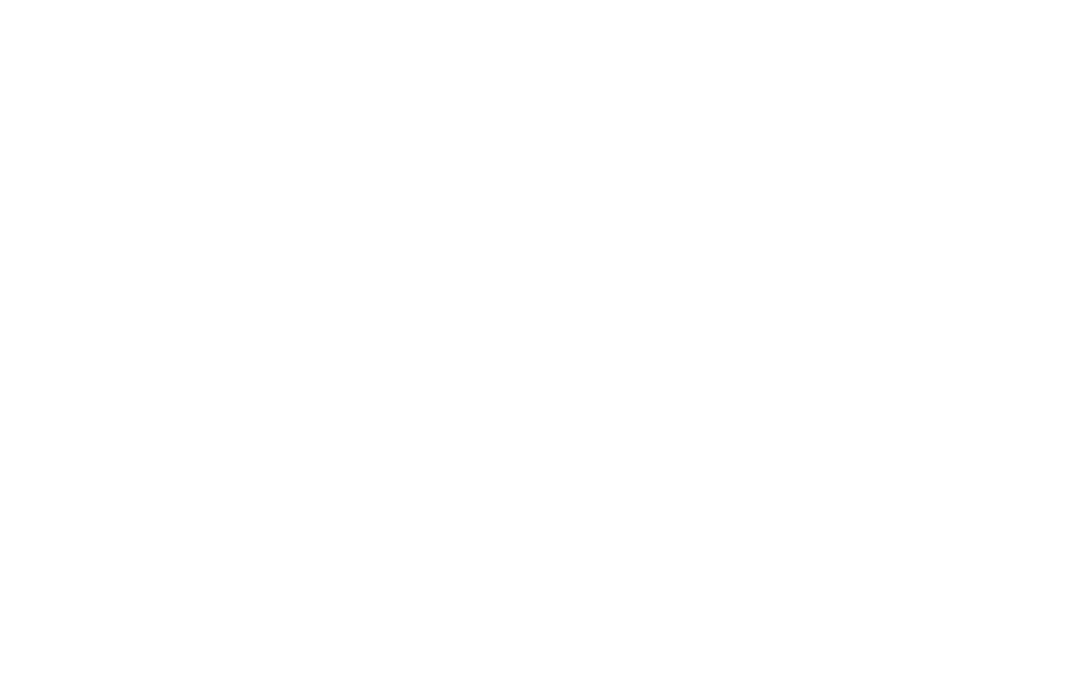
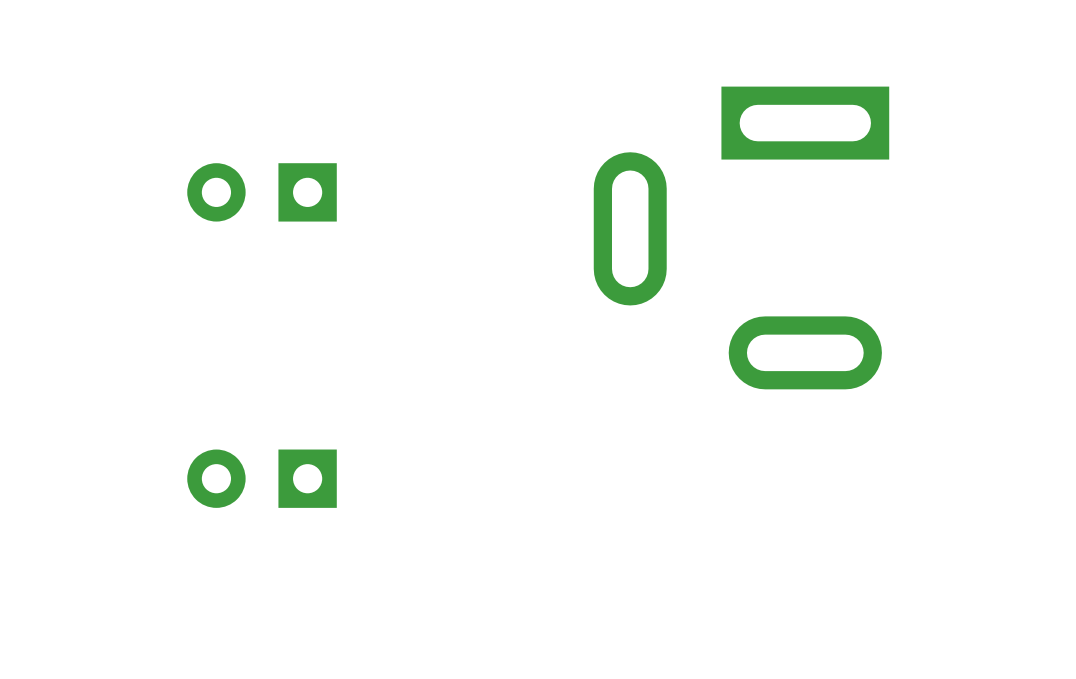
part: none -> (262, 192)
part: none -> (741, 237)
part: none -> (262, 478)

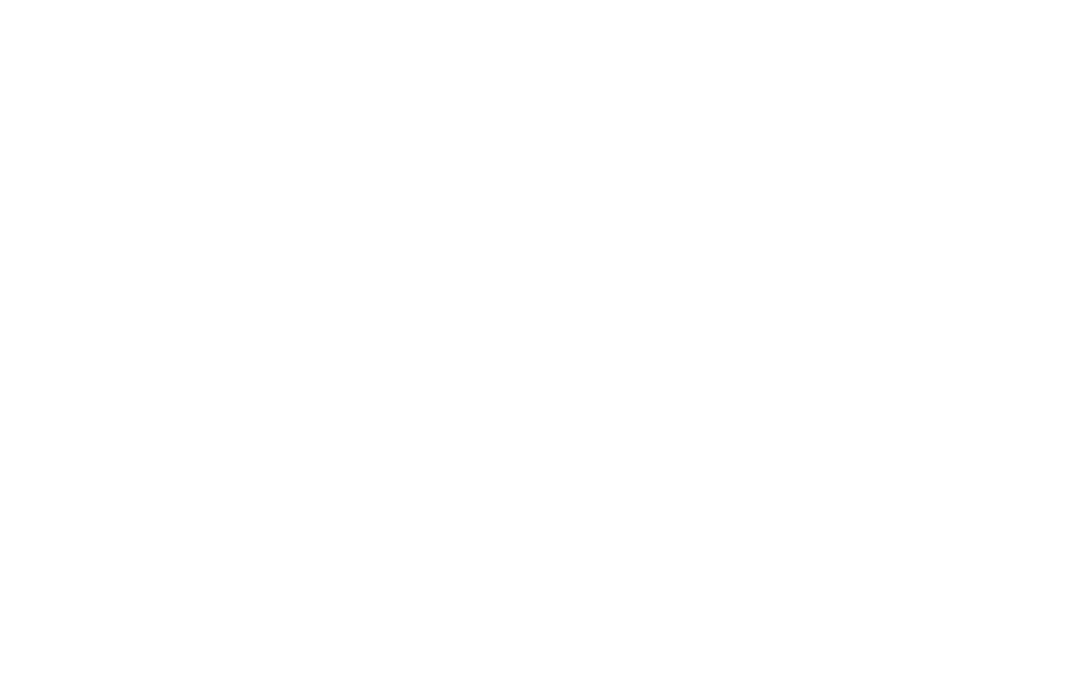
part: (262, 192) -> none
part: (741, 237) -> none
part: (262, 478) -> none

